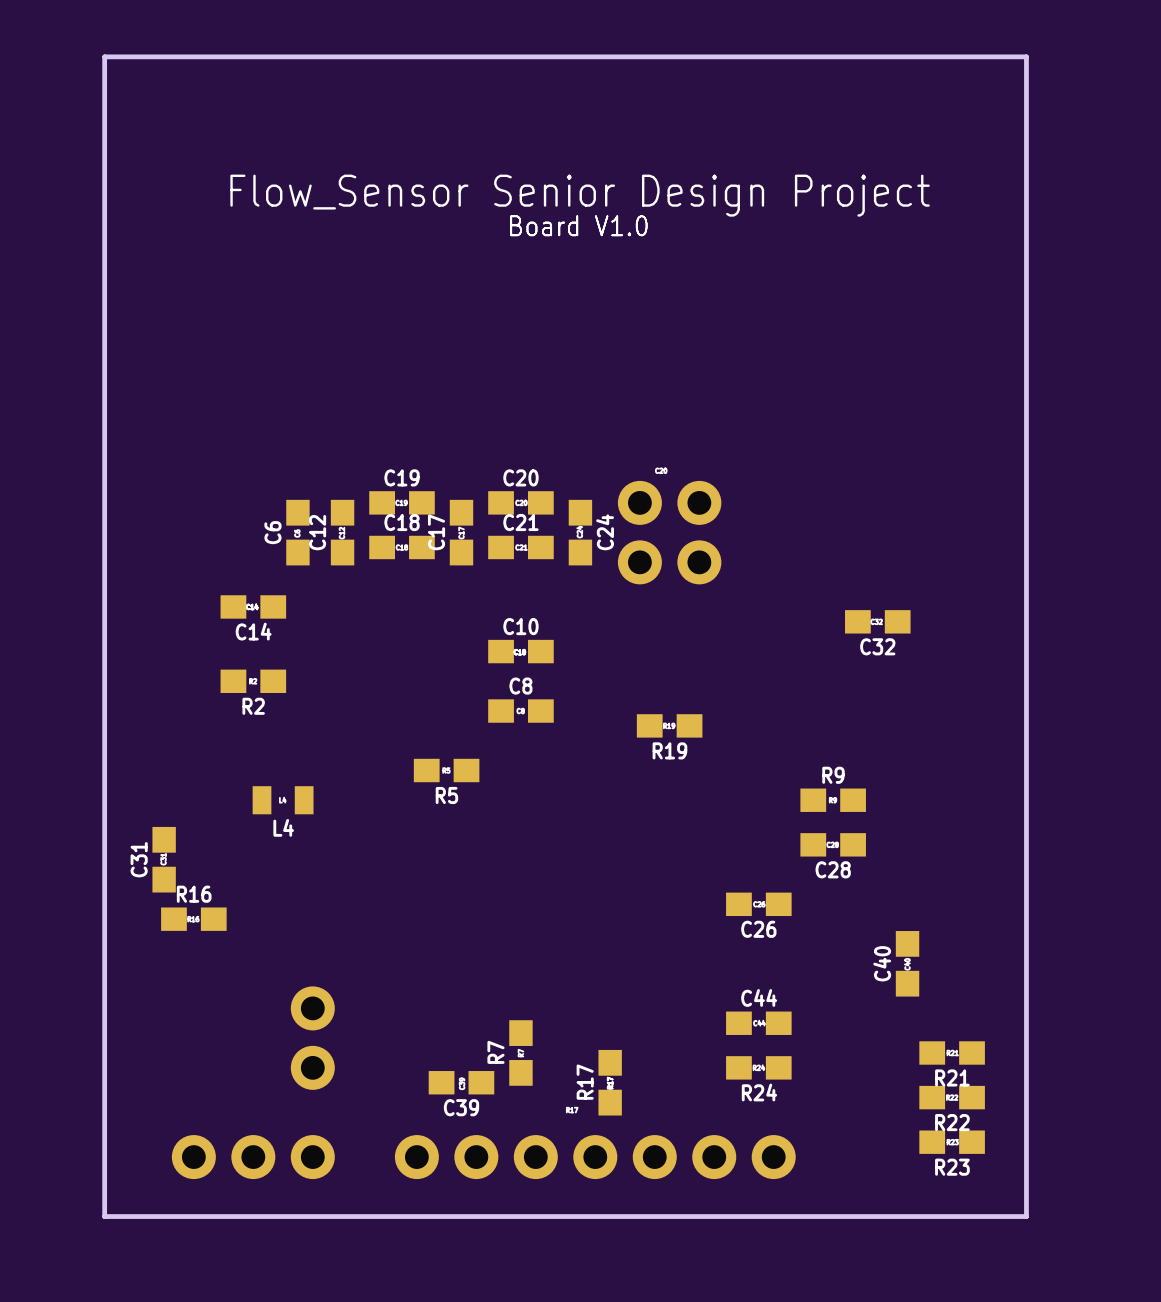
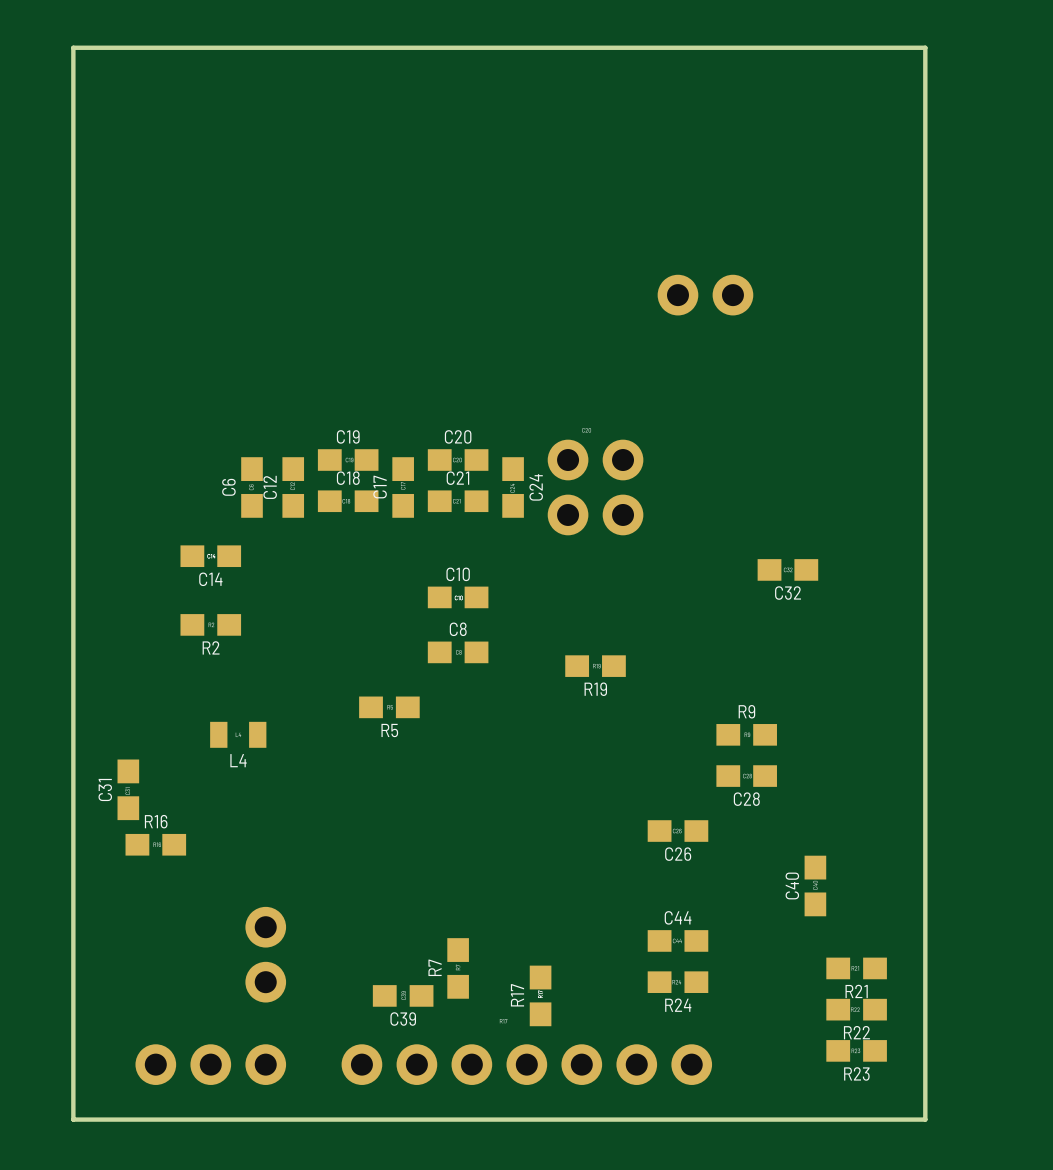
text: Flow_Sensor Senior Design Project (580, 195) -> none
text: Board V1.0 (578, 225) -> none
part: none -> (705, 295)

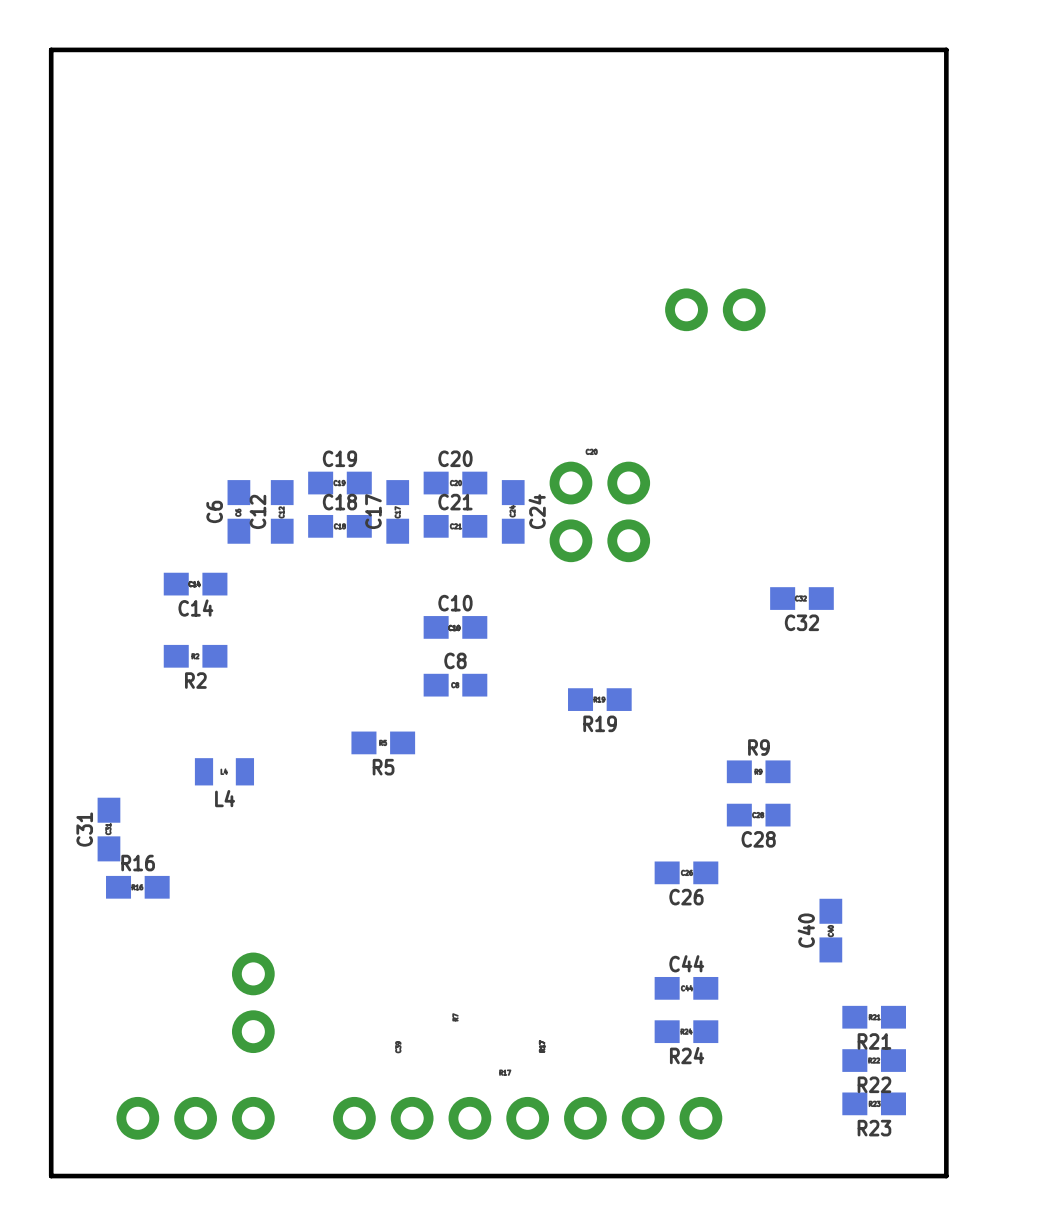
R7: (458, 968) -> none
C39: (403, 995) -> none
R17: (540, 995) -> none

